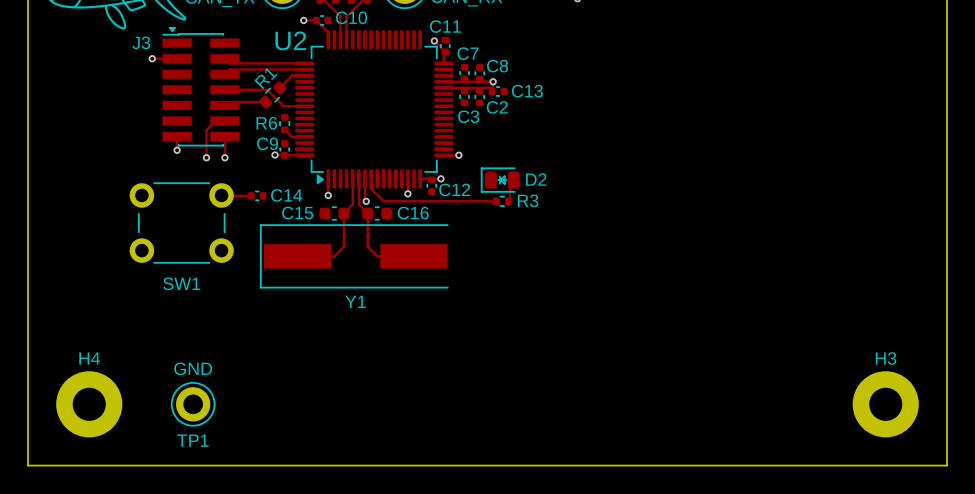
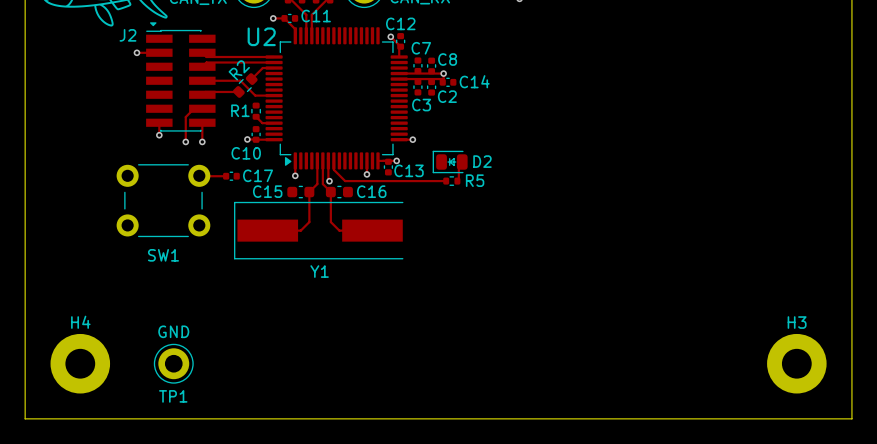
C10 name: C10 (351, 17) -> C11 (316, 16)
C11 name: C11 (445, 26) -> C12 (400, 23)
R1 name: R1 (265, 78) -> R2 (239, 70)
J2: none -> (180, 76)
J3: (201, 86) -> none
C13 name: C13 (527, 91) -> C14 (474, 81)
R6 name: R6 (266, 123) -> R1 (240, 110)
C9 name: C9 (267, 143) -> C10 (246, 153)
C12 name: C12 (454, 189) -> C13 (409, 170)
C14 name: C14 (286, 195) -> C17 (258, 175)
R3 name: R3 (528, 200) -> R5 (475, 180)

